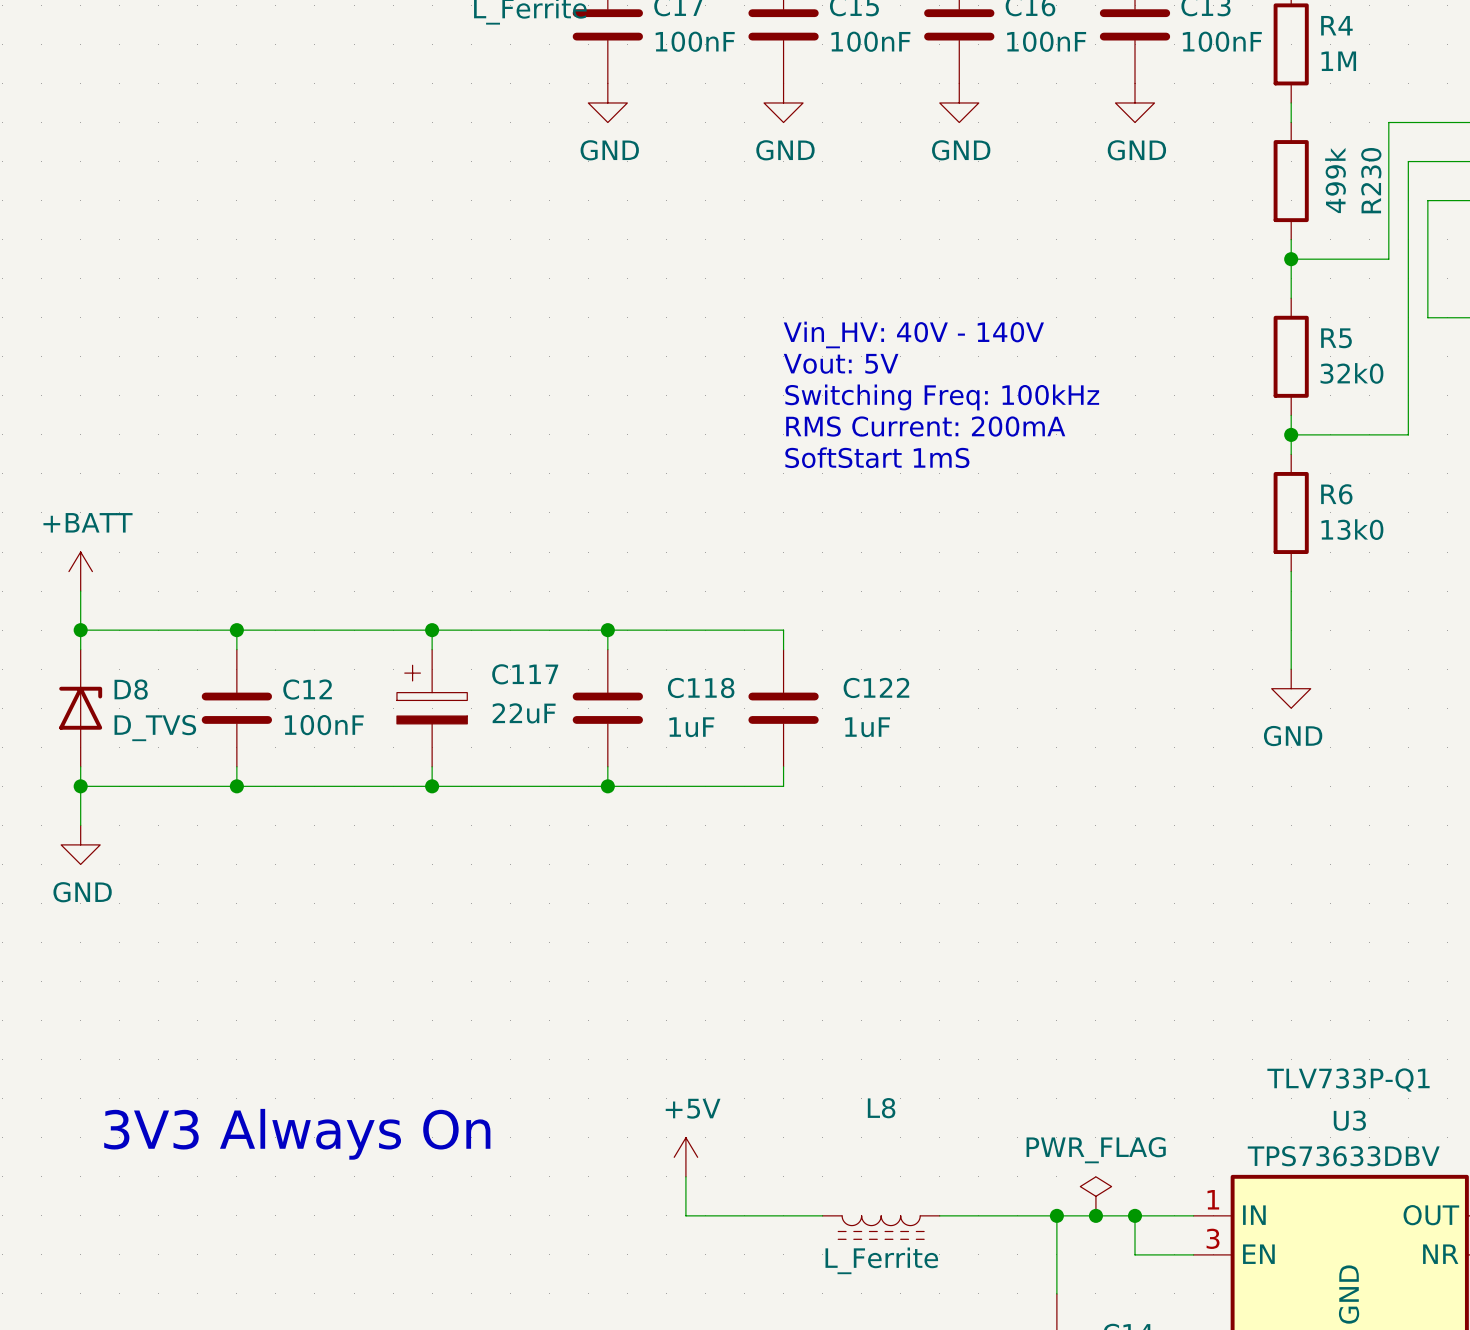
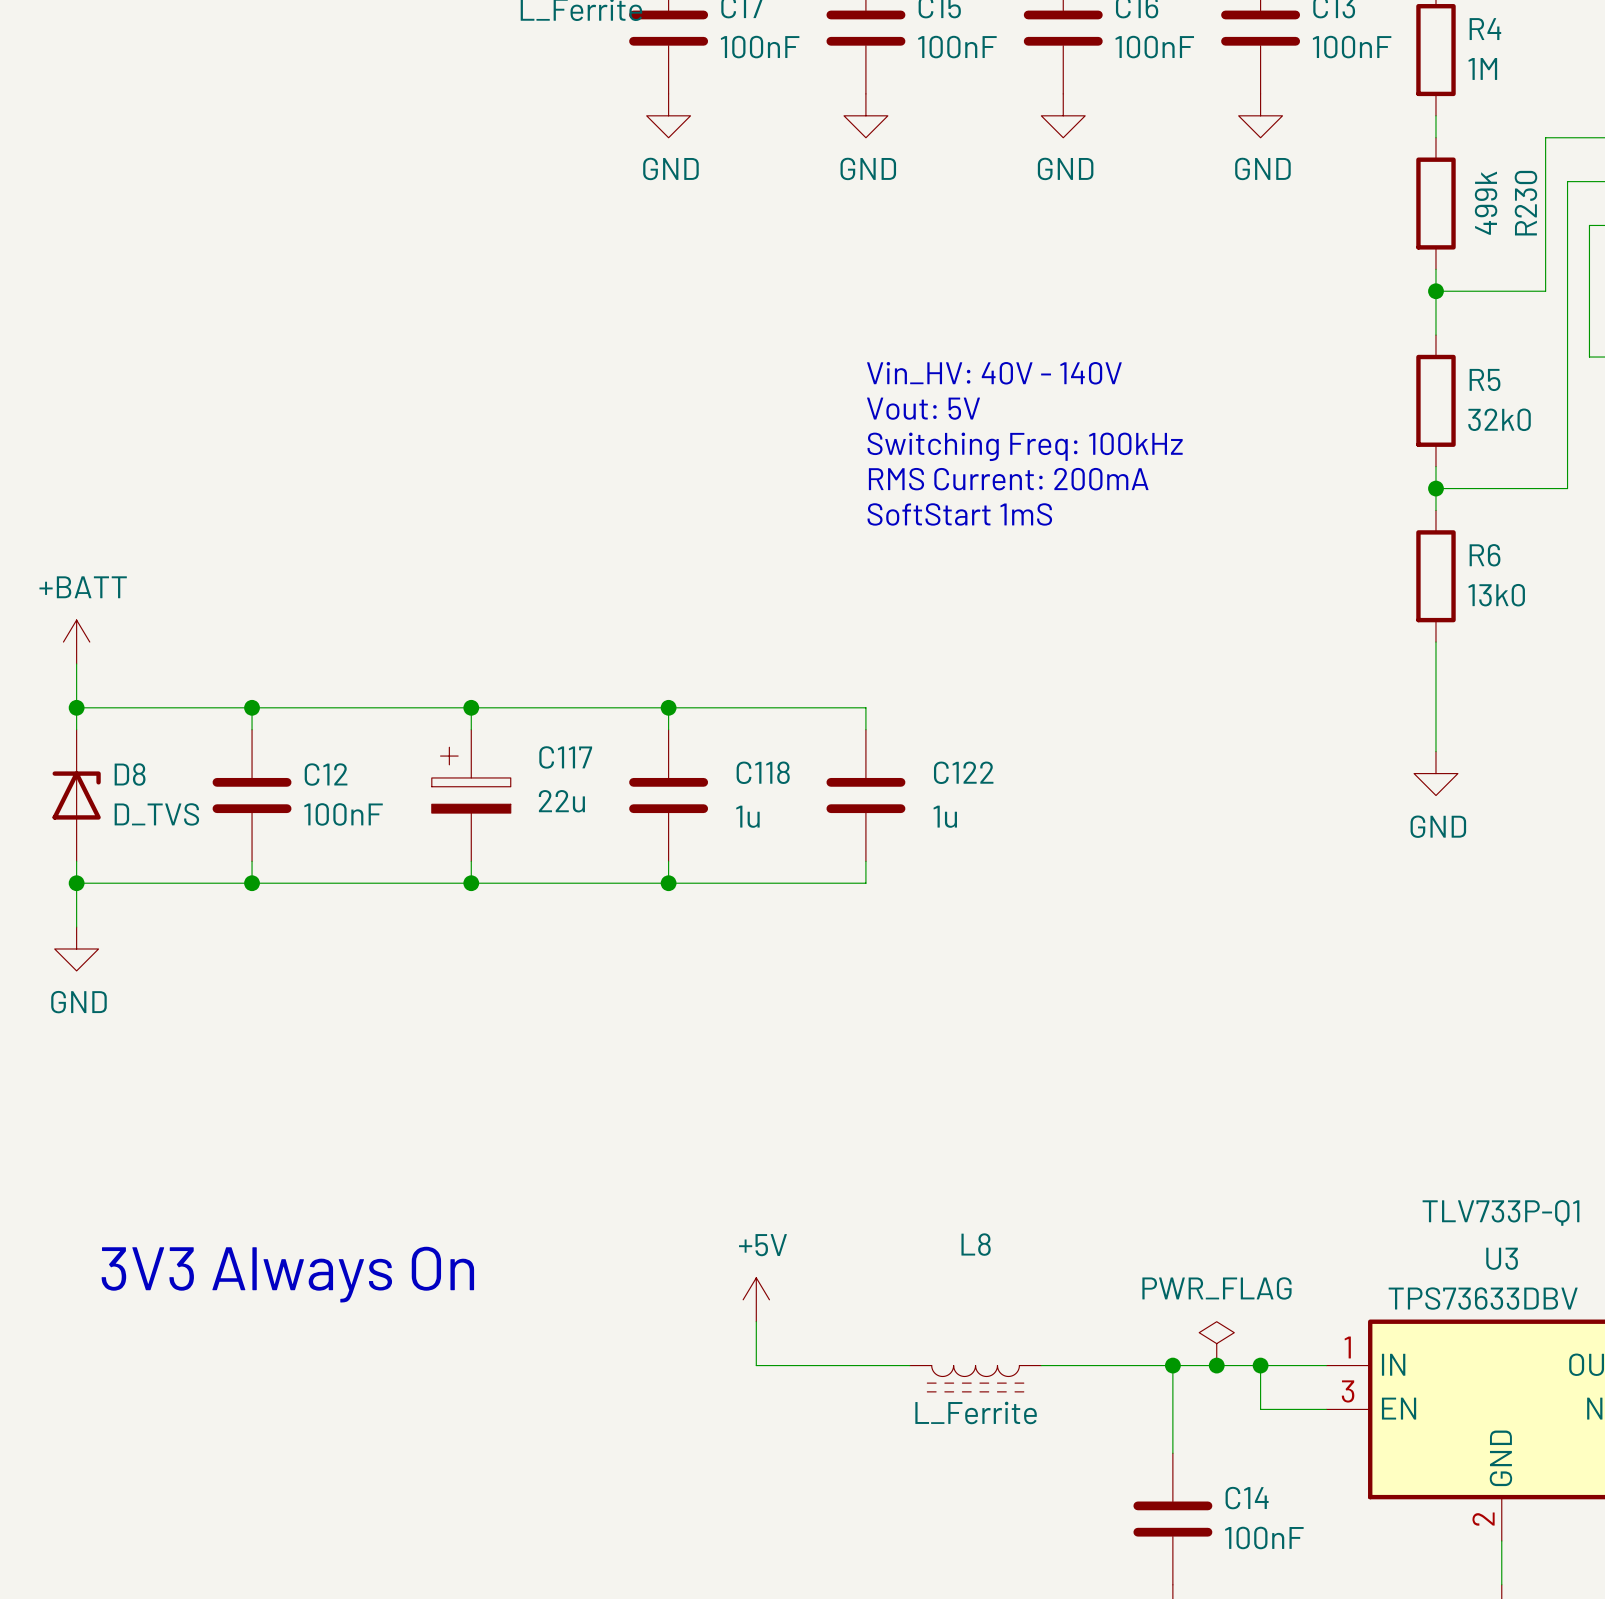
C117 value: 22uF (524, 713) -> 22u (561, 801)
C118 value: 1uF (691, 727) -> 1u (747, 816)
C122 value: 1uF (867, 727) -> 1u (945, 816)

